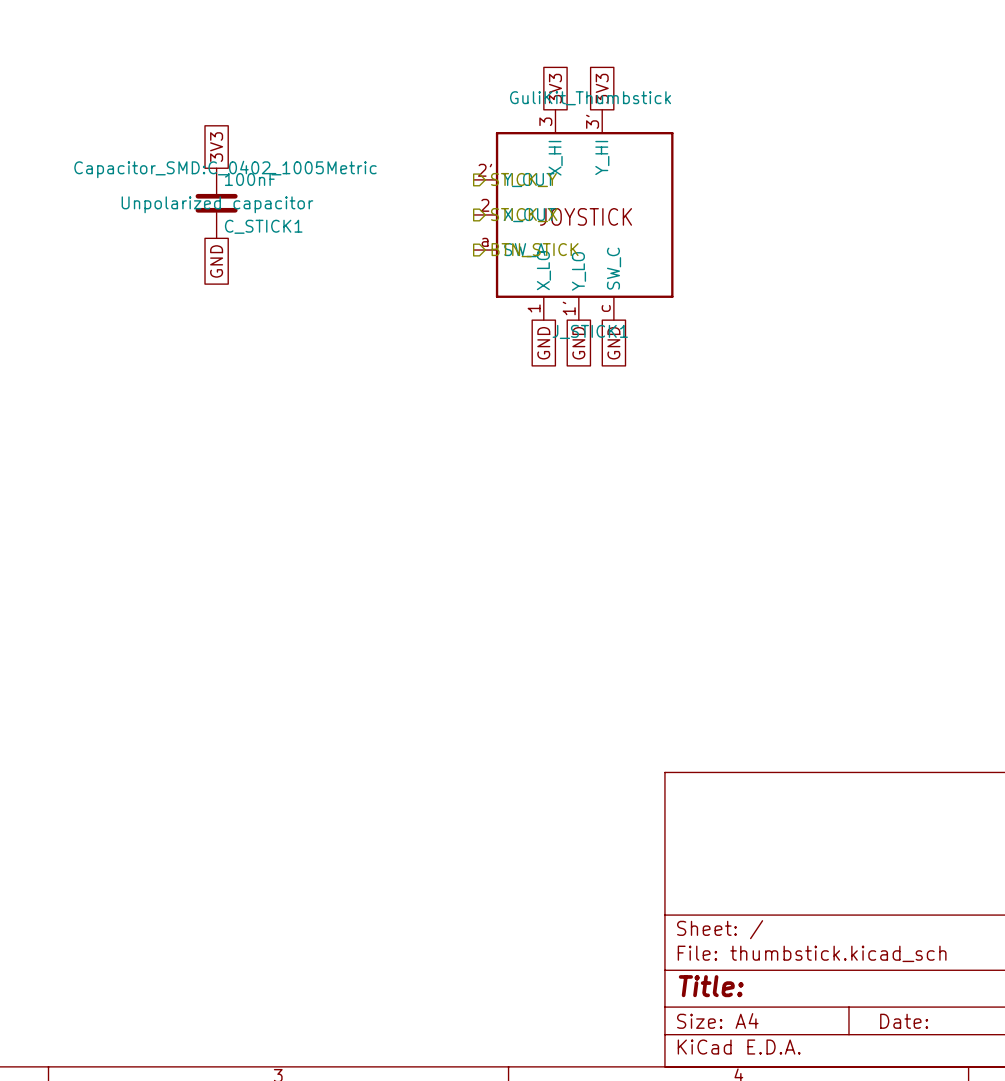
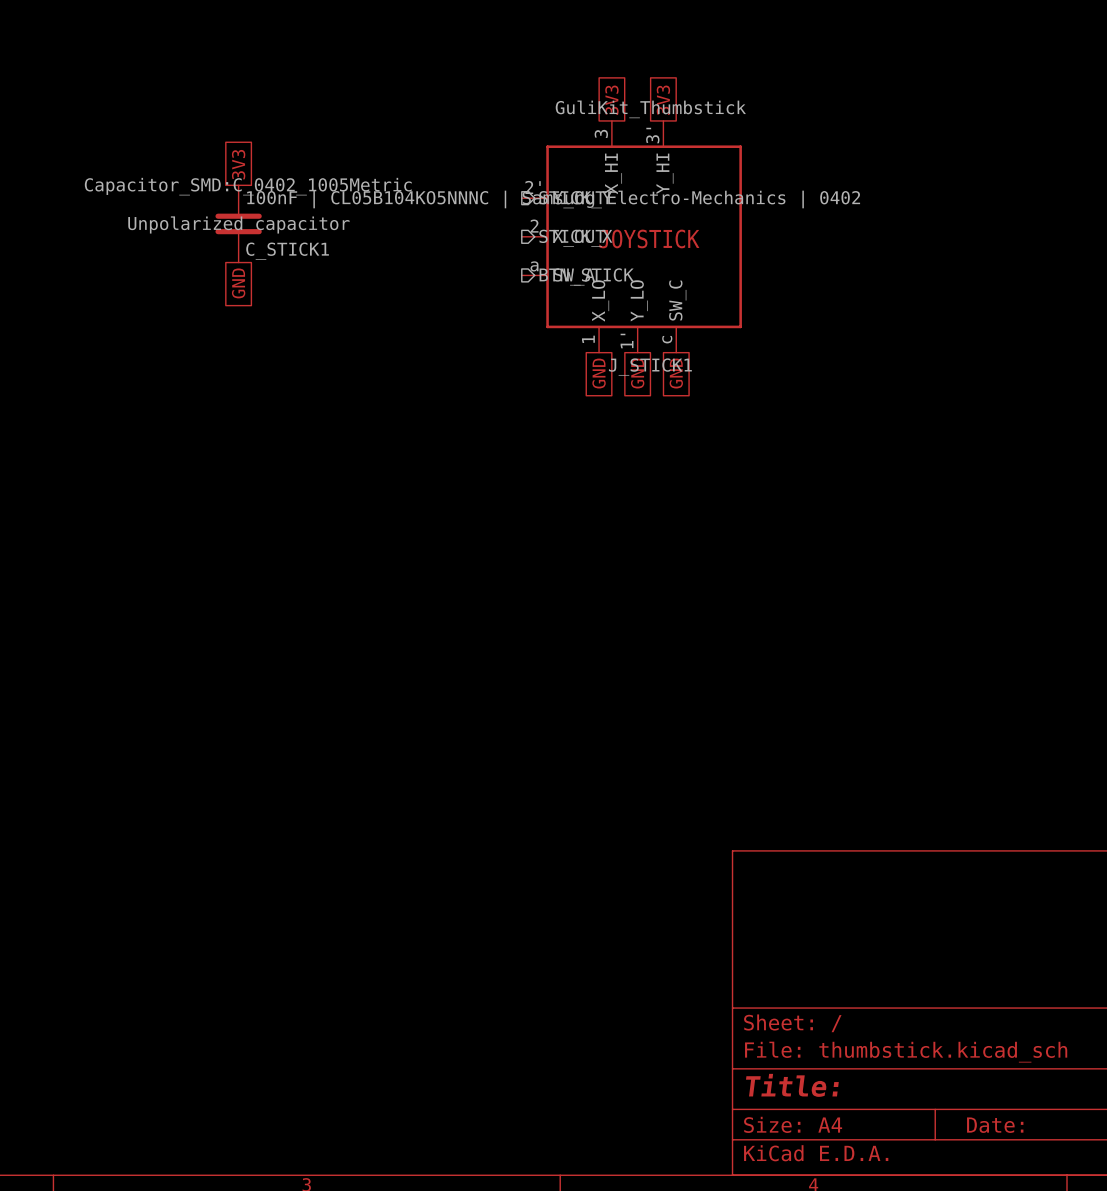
C_STICK1 value: 100nF (250, 179) -> 100nF | CL05B104KO5NNNC | Samsung Electro-Mechanics | 0402 (553, 199)

